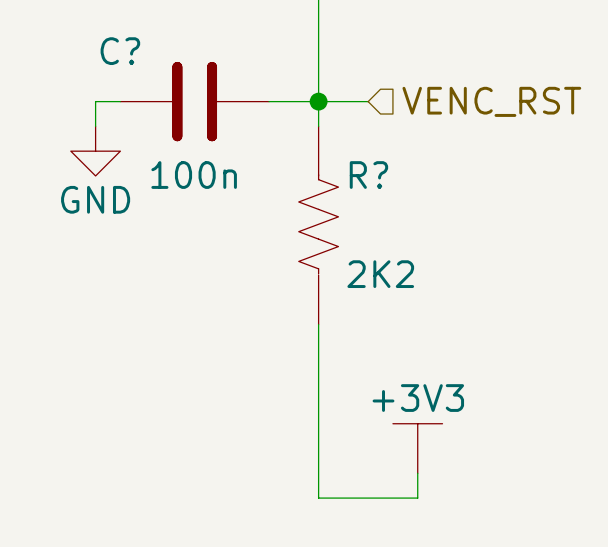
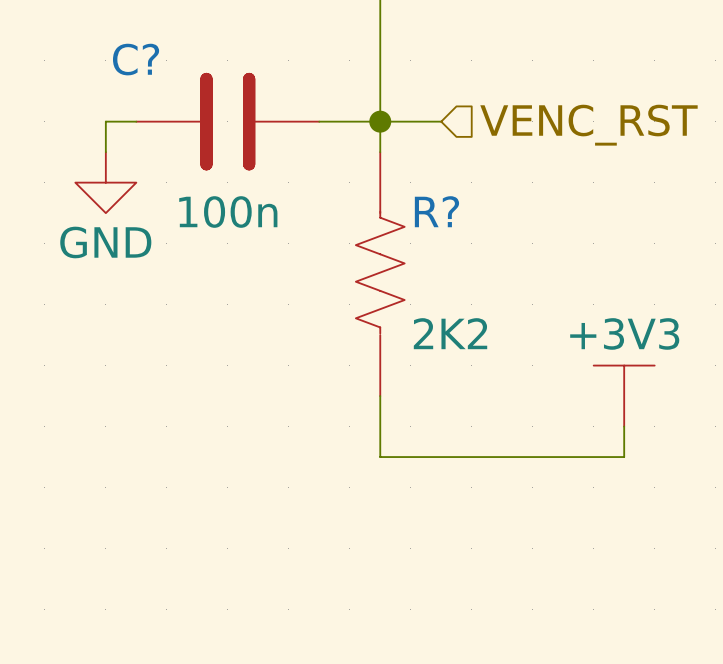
wire: (318, 374) (318, 498) (417, 498) (417, 473) -> (380, 457) (624, 457) (624, 426)
power symbol position: +3V3 (417, 448) -> +3V3 (624, 396)

